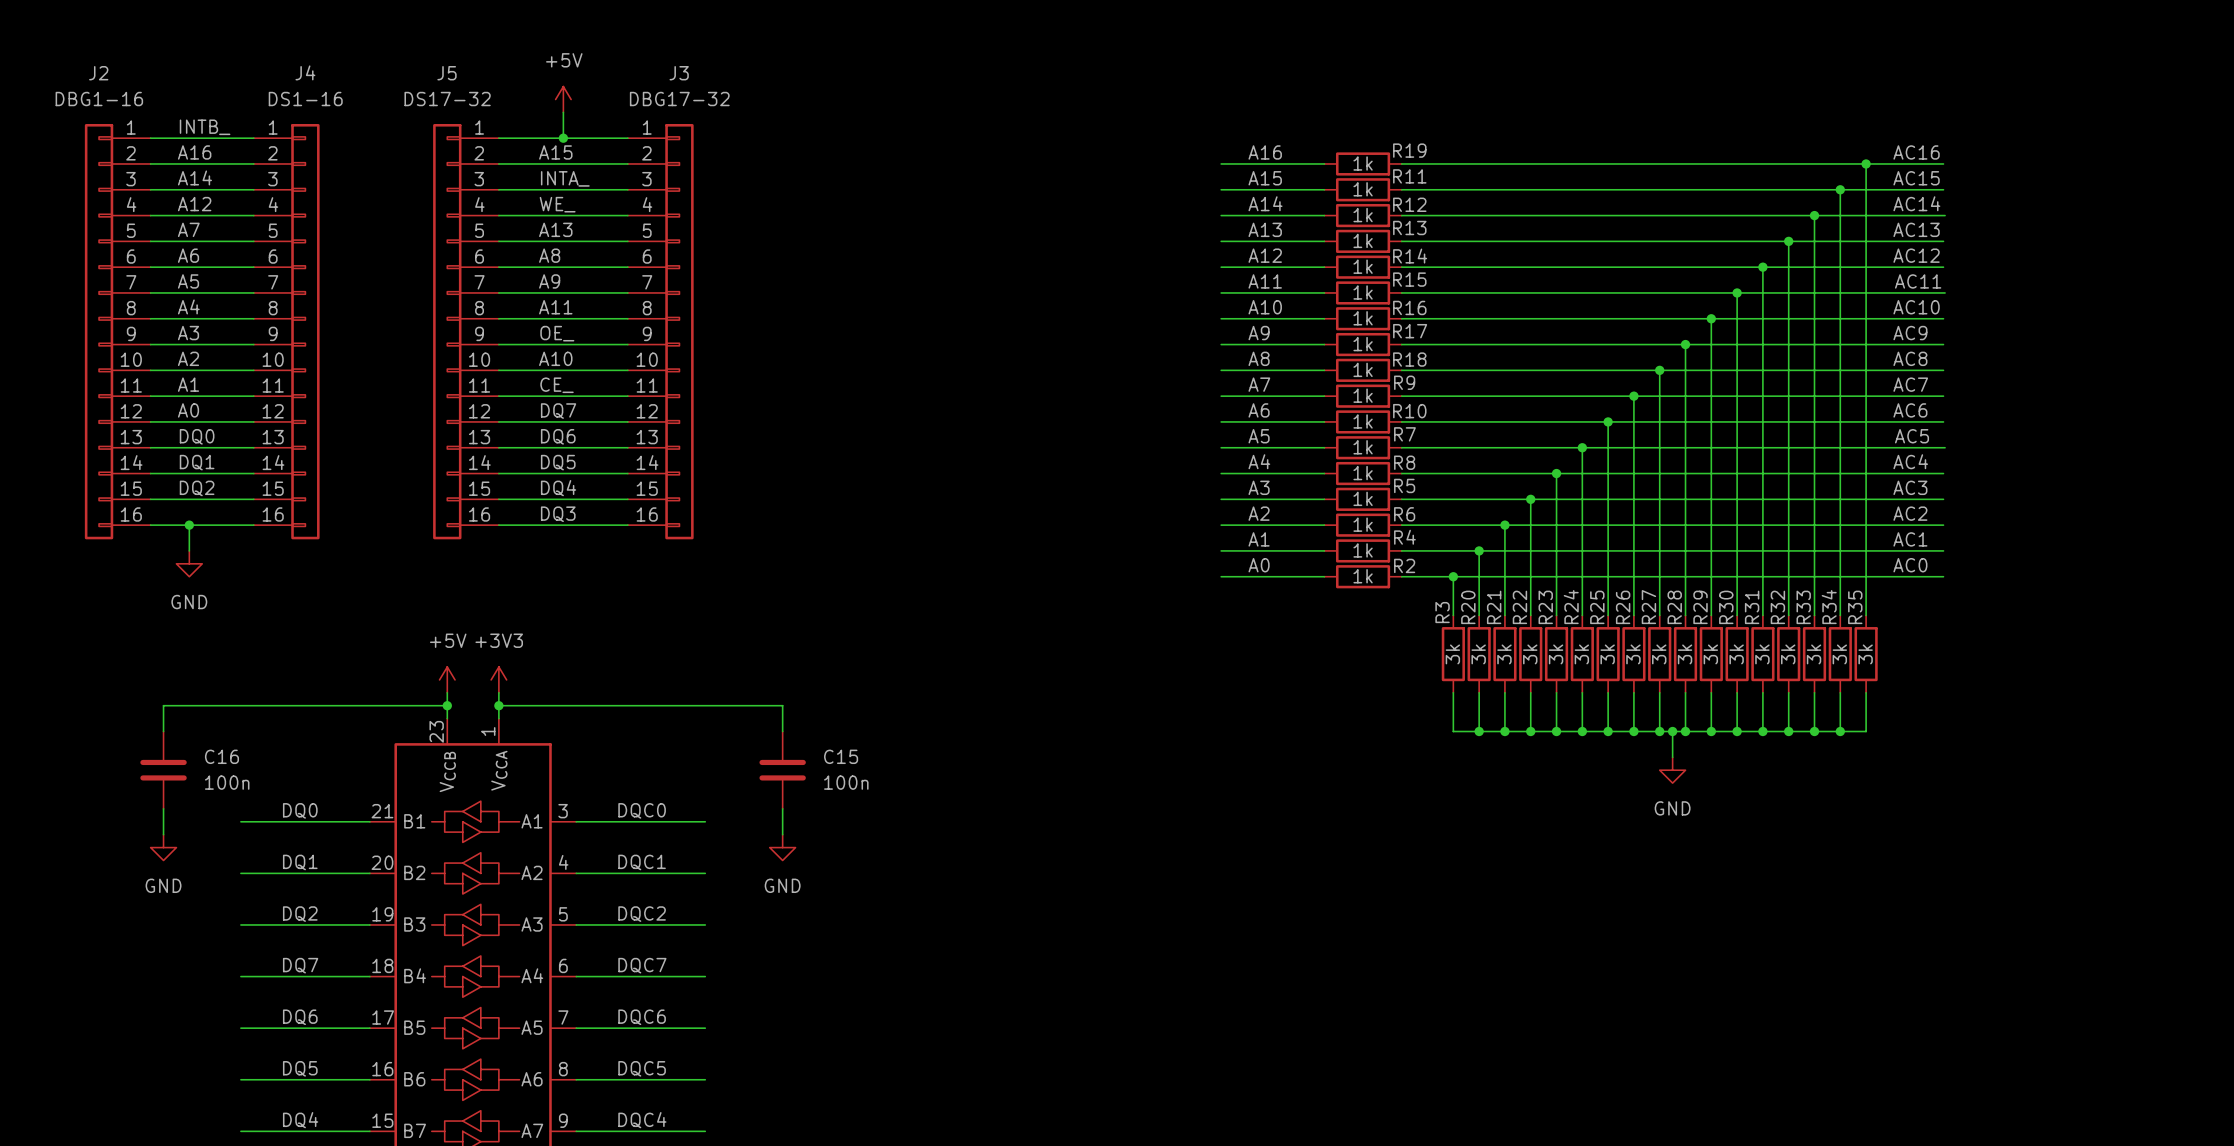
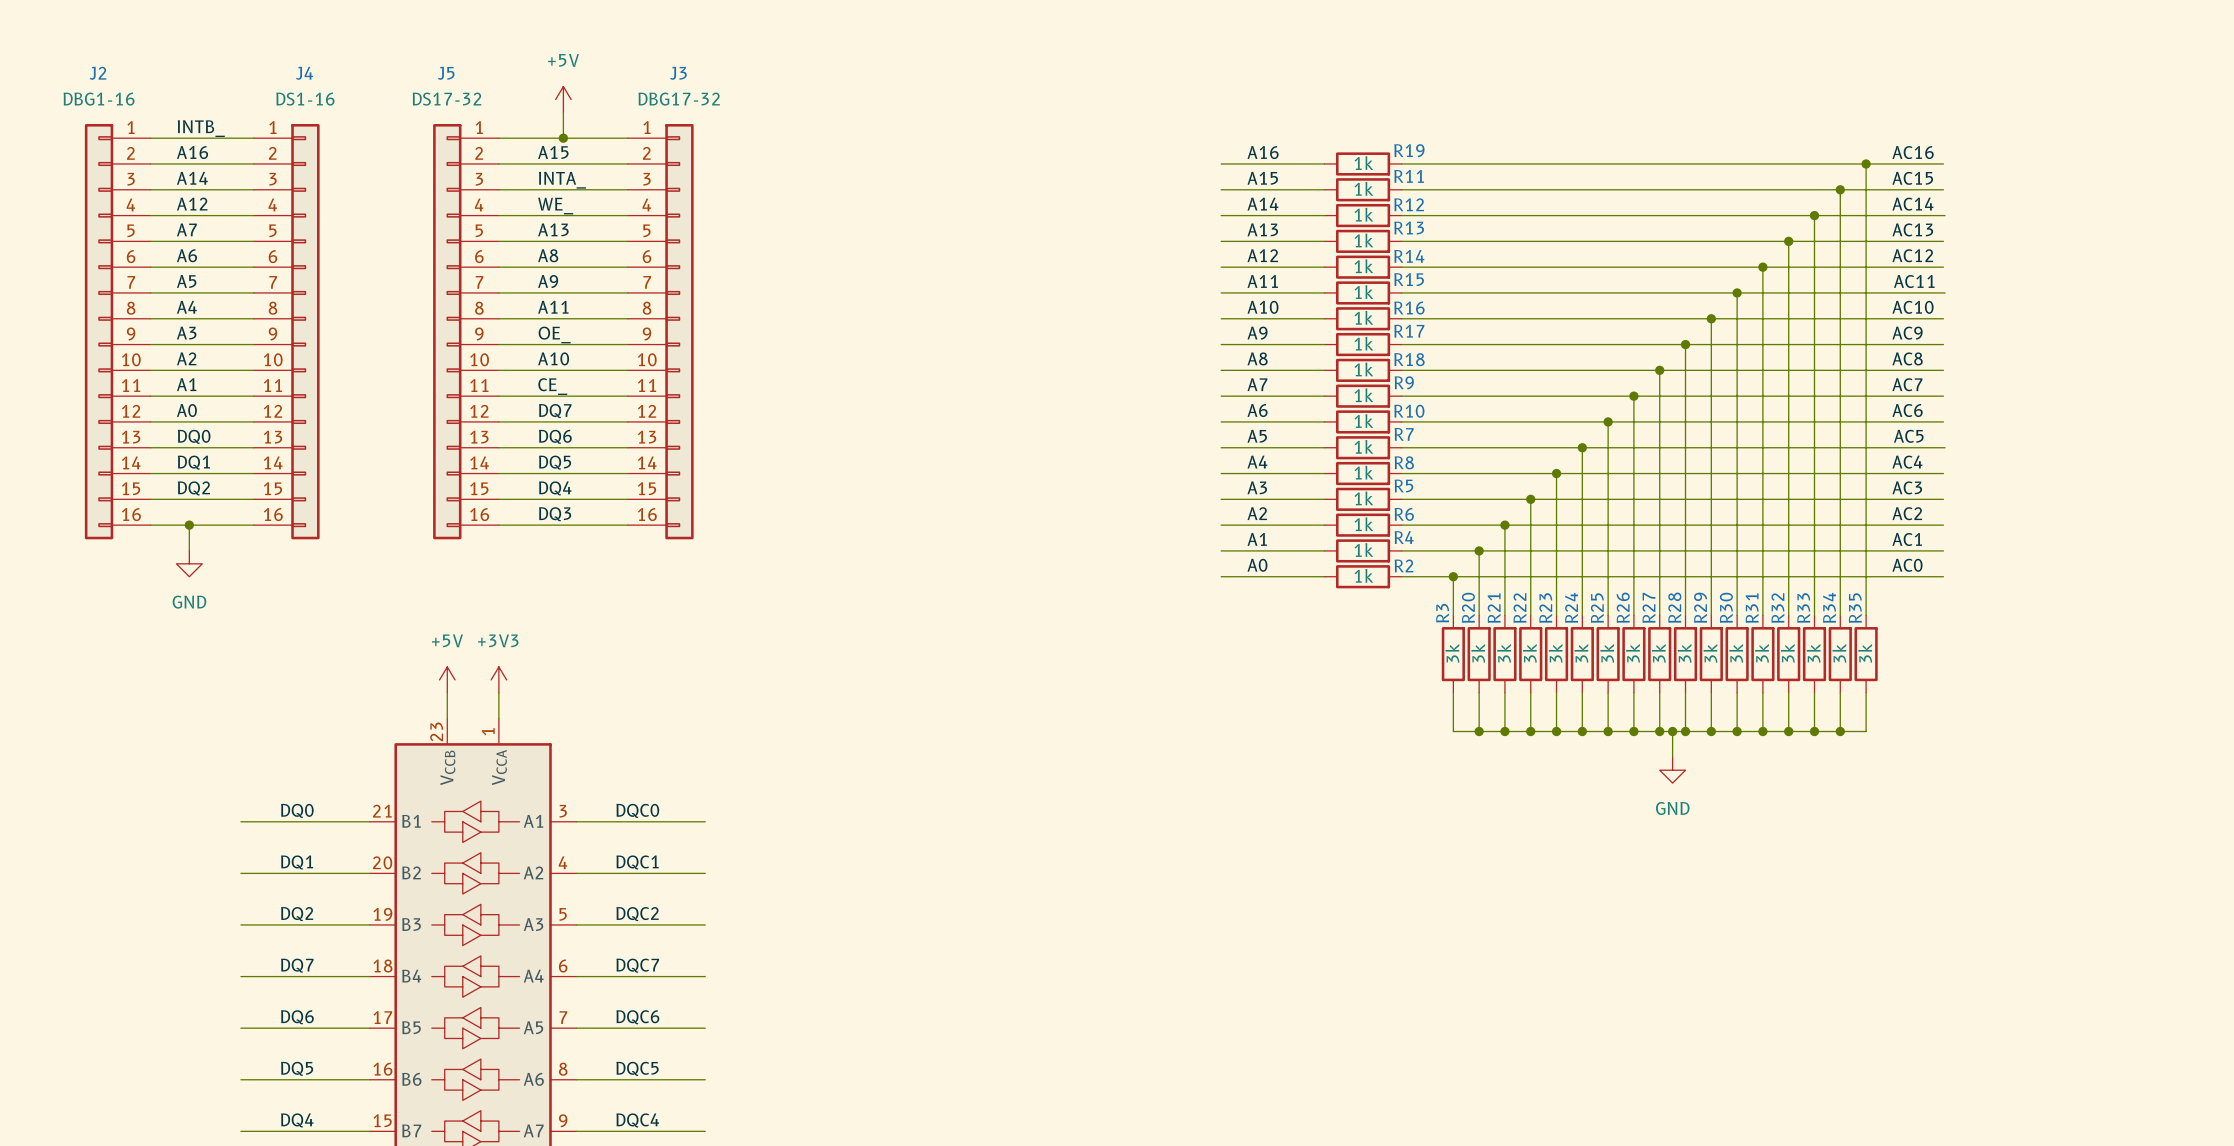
wire: (447, 705) (163, 705) (163, 731) -> none
junction: (447, 705) -> none
wire: (498, 705) (782, 705) (782, 731) -> none
junction: (498, 705) -> none
C16: 100n (163, 770) -> none
C15: 100n (782, 770) -> none
wire: (163, 808) (163, 834) -> none
wire: (782, 808) (782, 834) -> none
power symbol: GND (163, 847) -> none
power symbol: GND (782, 847) -> none

